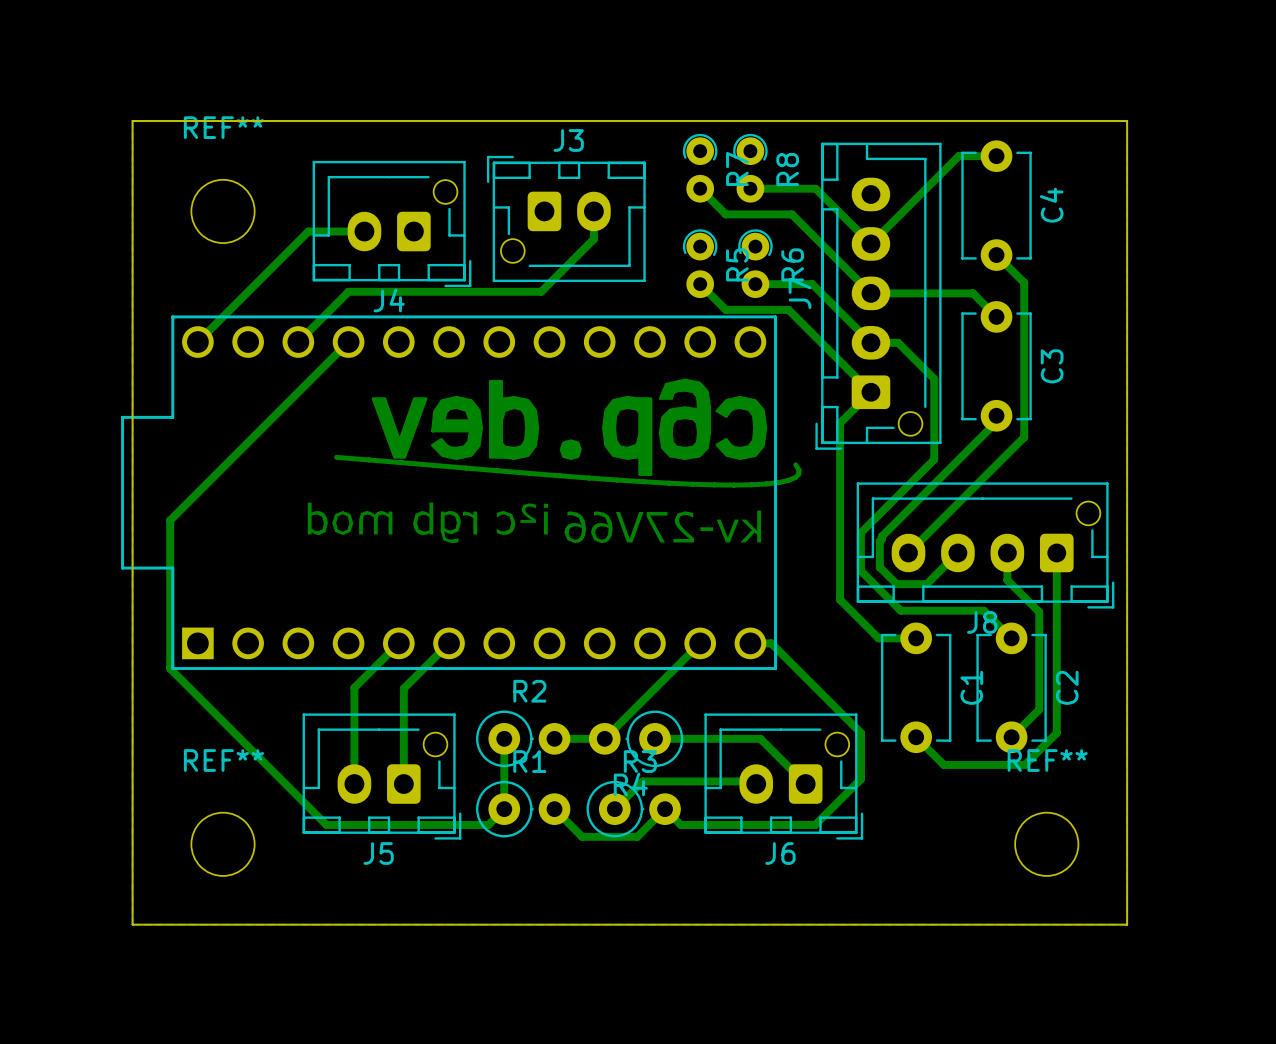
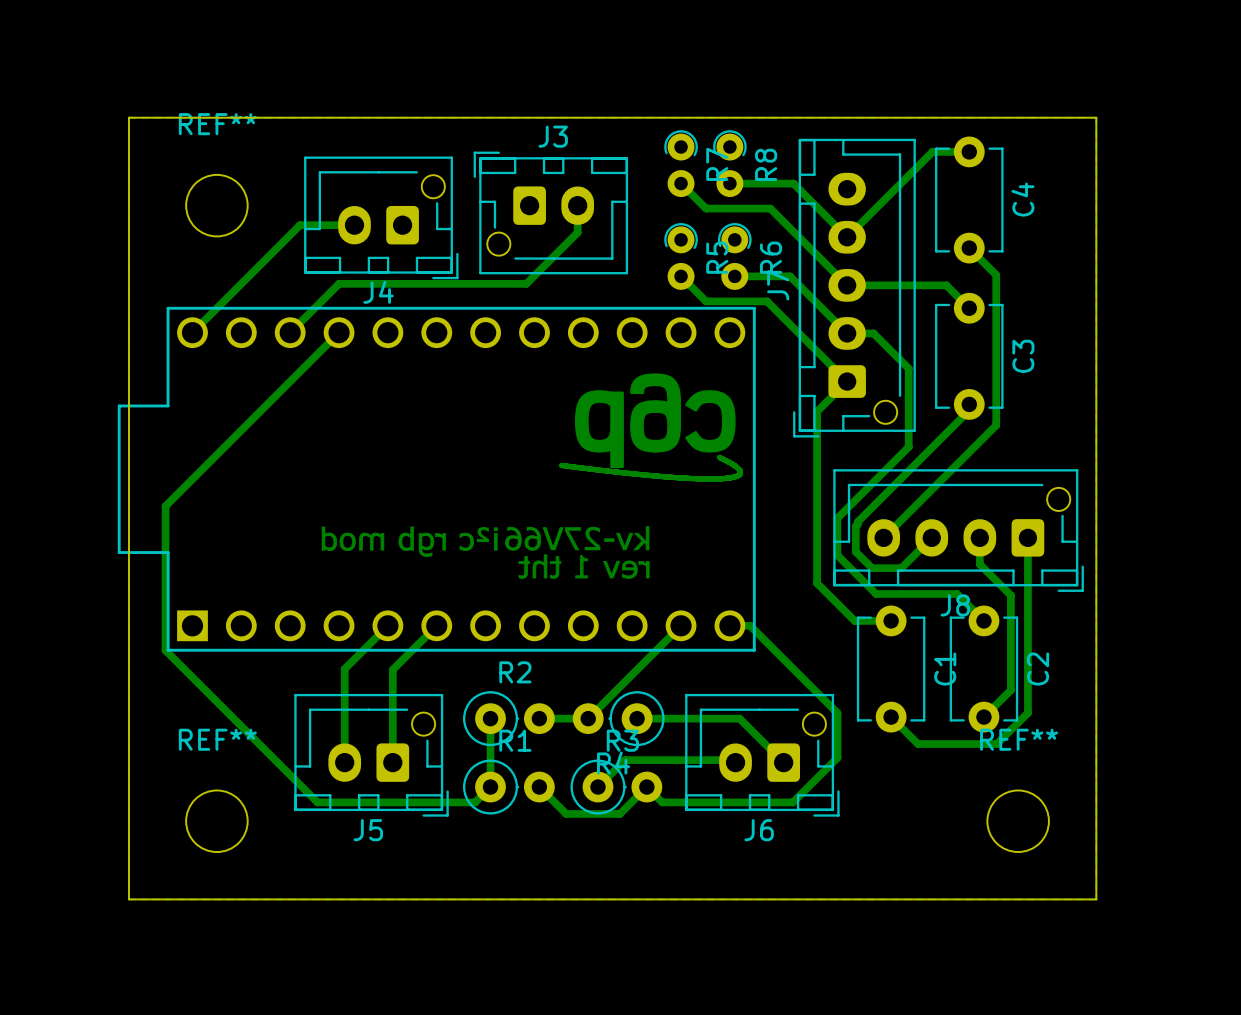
drawing: [307, 378, 802, 544] -> none
drawing: none -> [558, 373, 744, 482]
drawing: none -> [321, 526, 650, 579]

